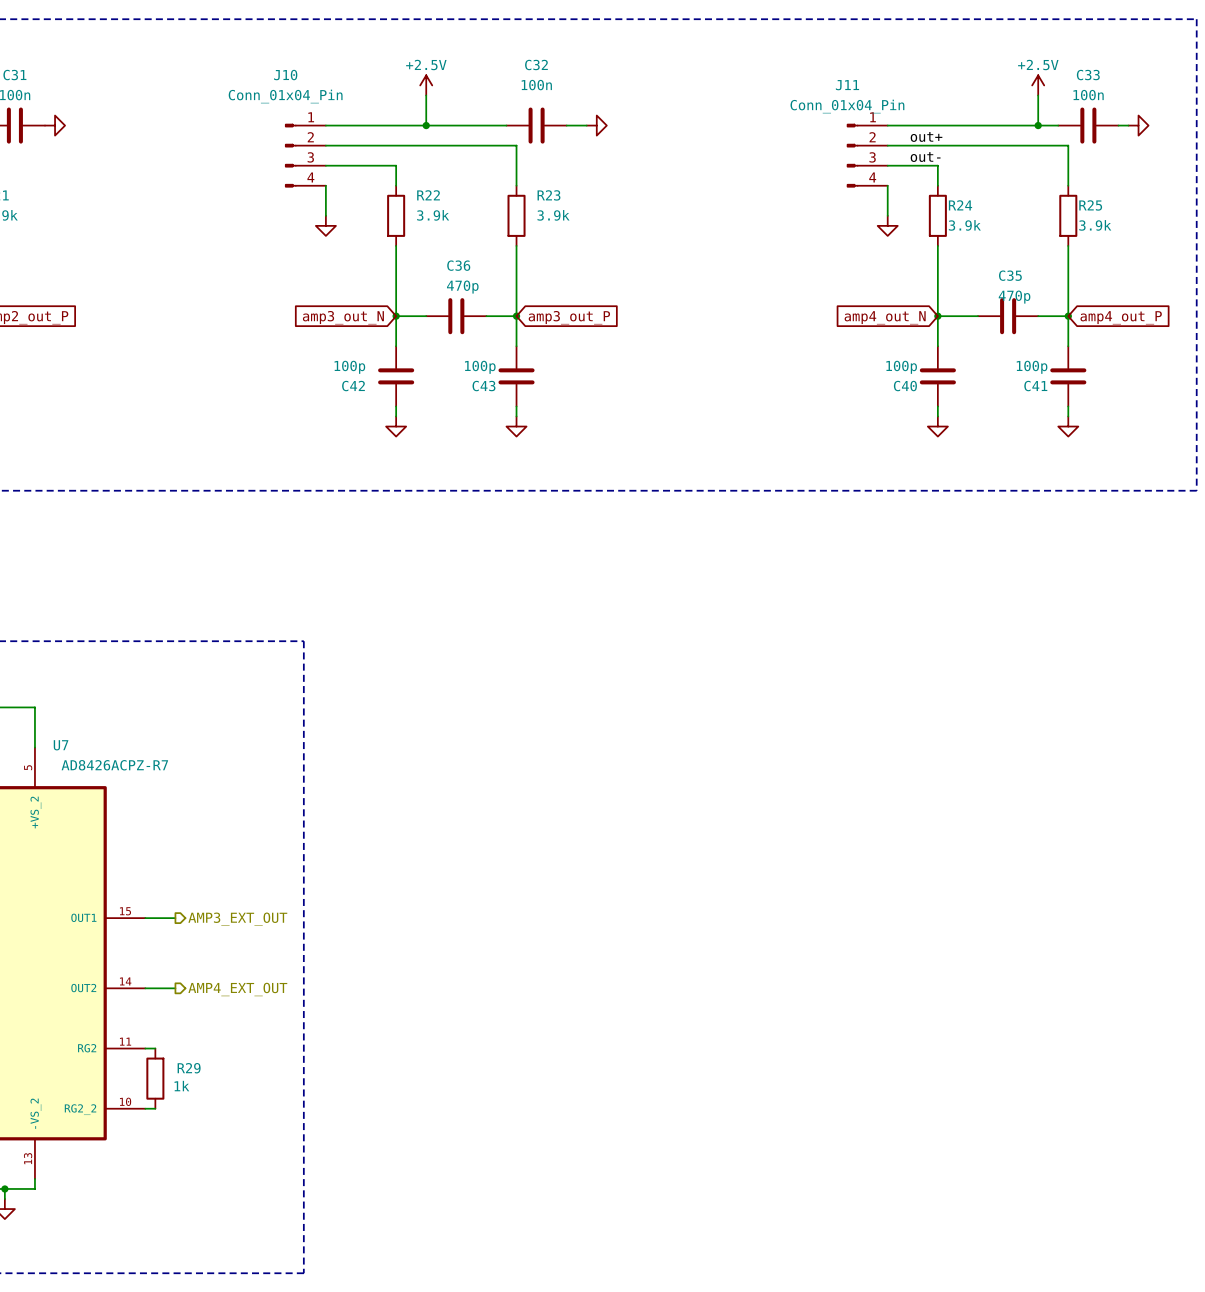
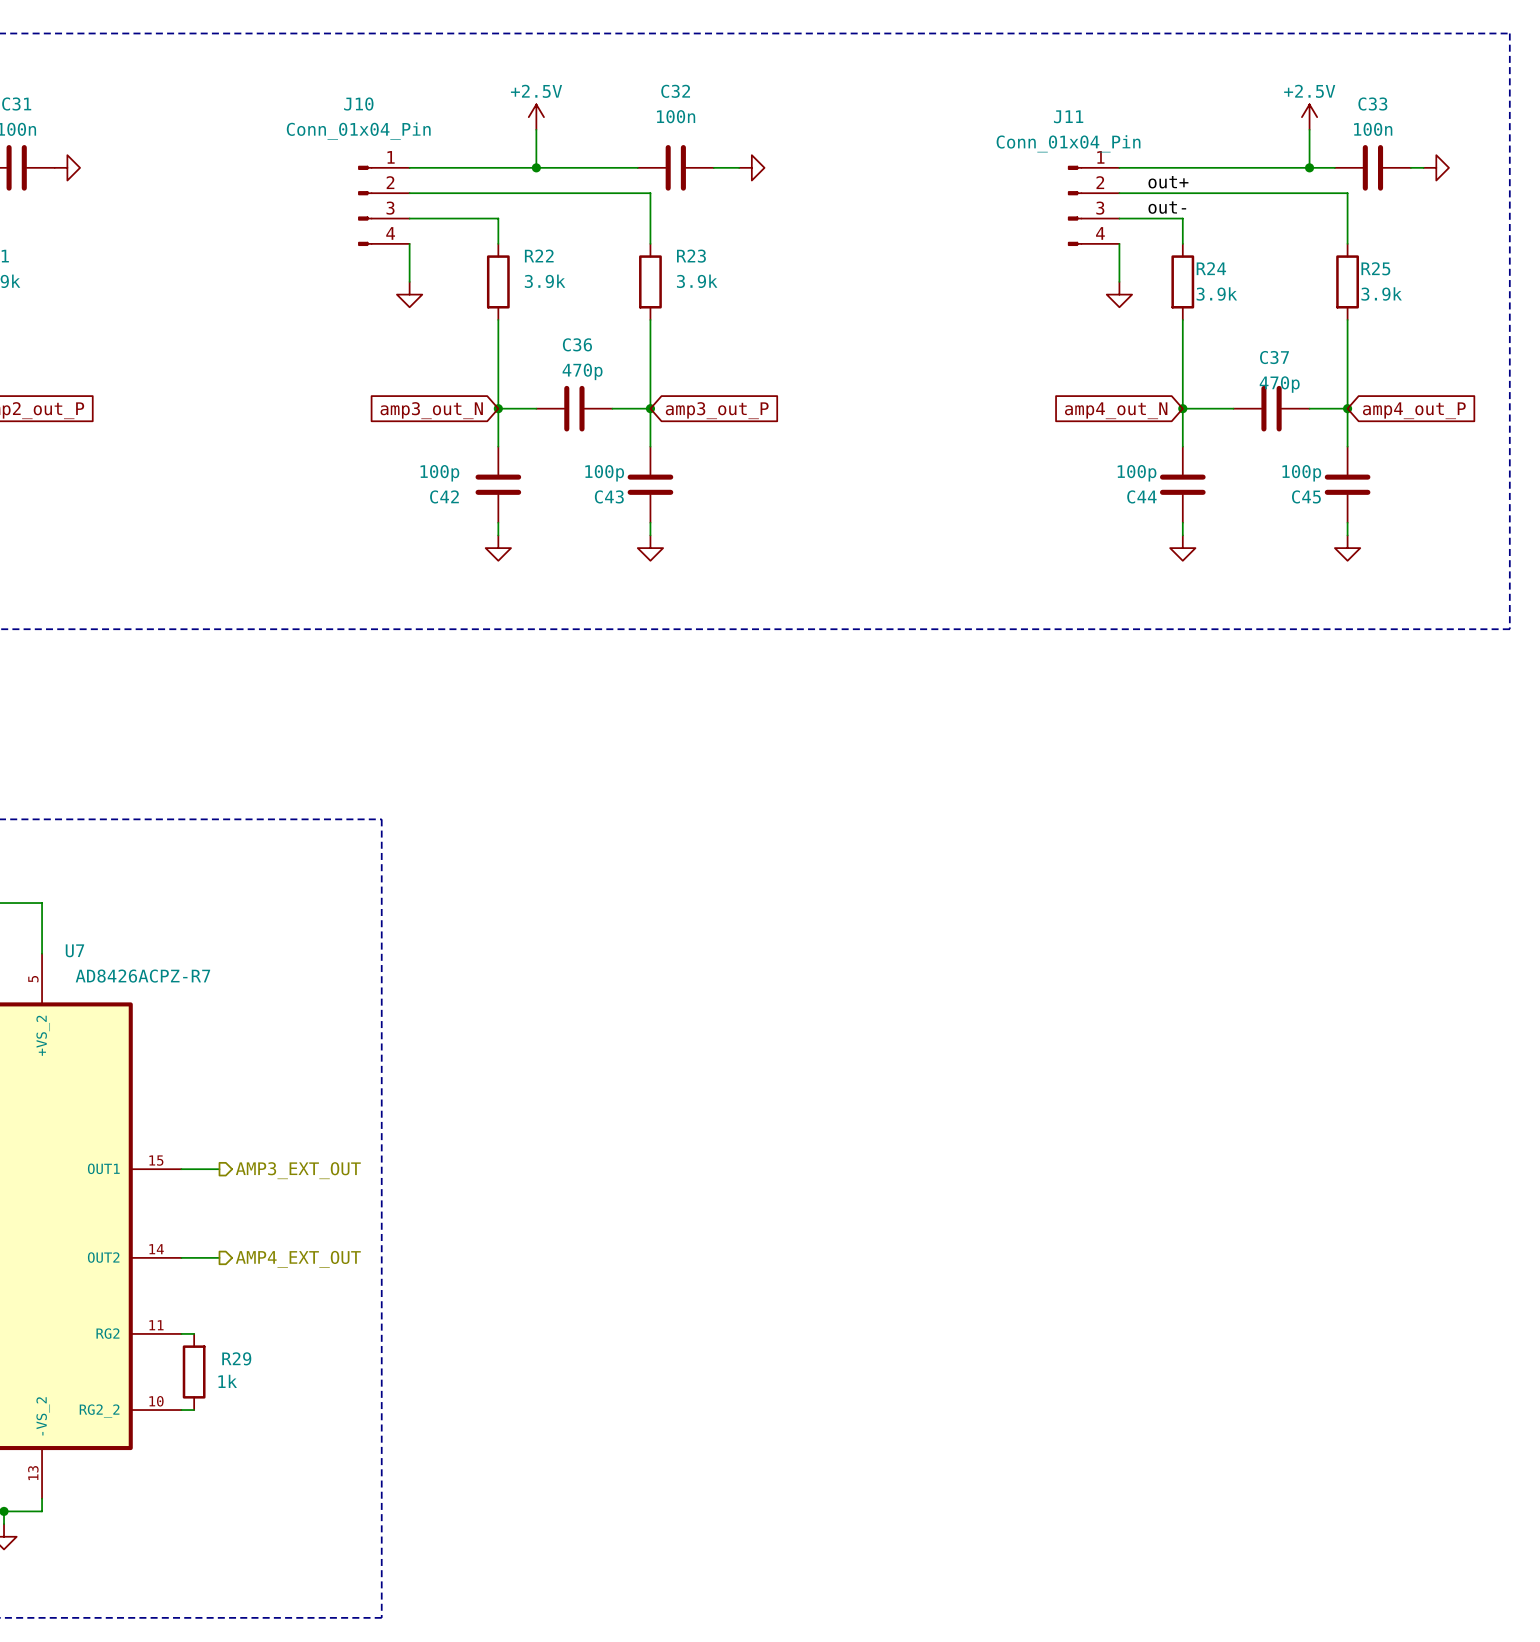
C35 name: C35 (1010, 275) -> C37 (1274, 357)
C40 name: C40 (905, 386) -> C44 (1141, 496)
C41 name: C41 (1035, 386) -> C45 (1306, 496)

